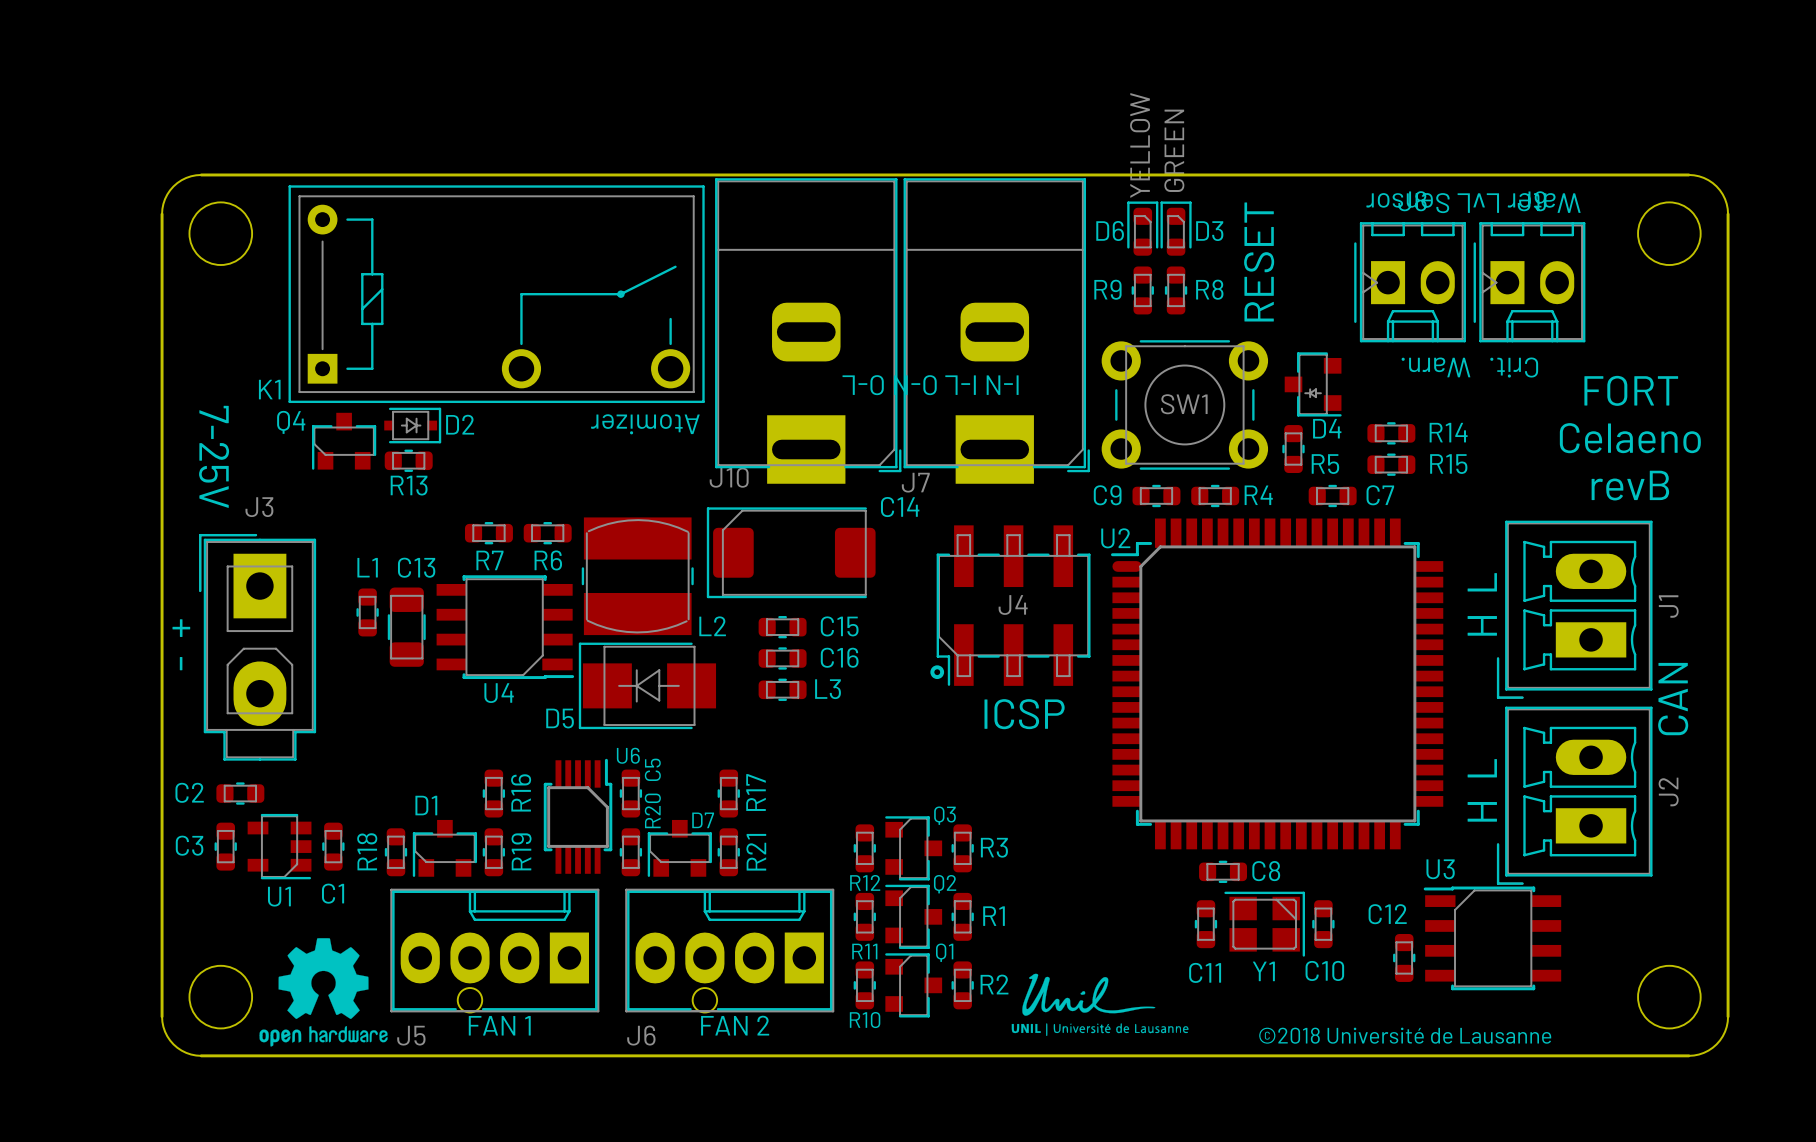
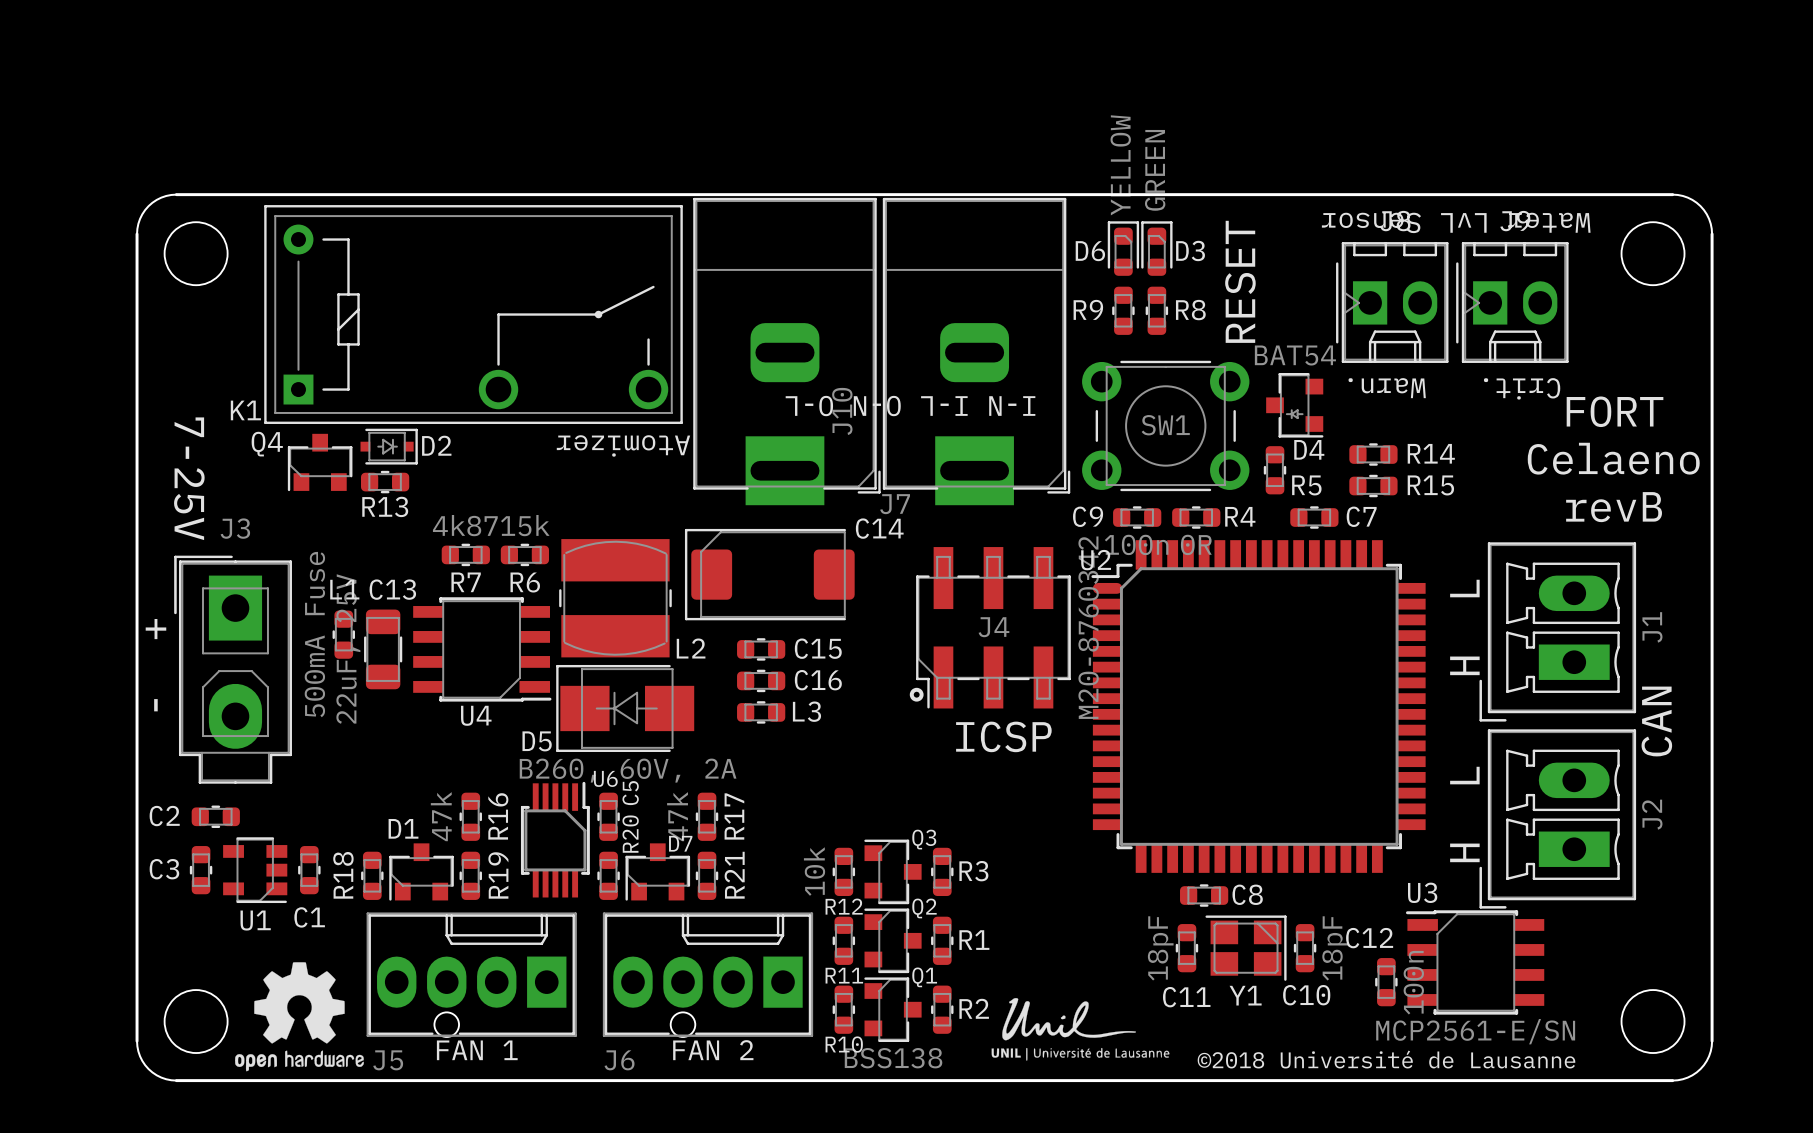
D4 value: none -> BAT54 (1295, 355)
J10 name rotation: 0° (729, 477) -> 90° counterclockwise (842, 411)
J10 name position: J10 (729, 477) -> J10 (842, 411)
R7 value: none -> 4k87 (465, 525)
R6 value: none -> 15k (525, 525)
C9 value: none -> 100n (1136, 544)
R4 value: none -> 0R (1196, 544)
J4 value: none -> M20-8760342 (1088, 627)
L1 value: none -> 500mA Fuse (314, 634)
C13 value: none -> 22uF, 25V (348, 649)
D5 value: none -> B260, 60V, 2A (628, 770)
R16 value: none -> 47k (441, 816)
R17 value: none -> 47k (677, 816)
R12 value: none -> 10k (814, 871)
C11 value: none -> 18pF (1160, 948)
C10 value: none -> 18pF (1335, 948)
C12 value: none -> 100n (1413, 982)
U3 value: none -> MCP2561-E/SN (1475, 1031)
Q1 value: none -> BSS138 (893, 1058)

